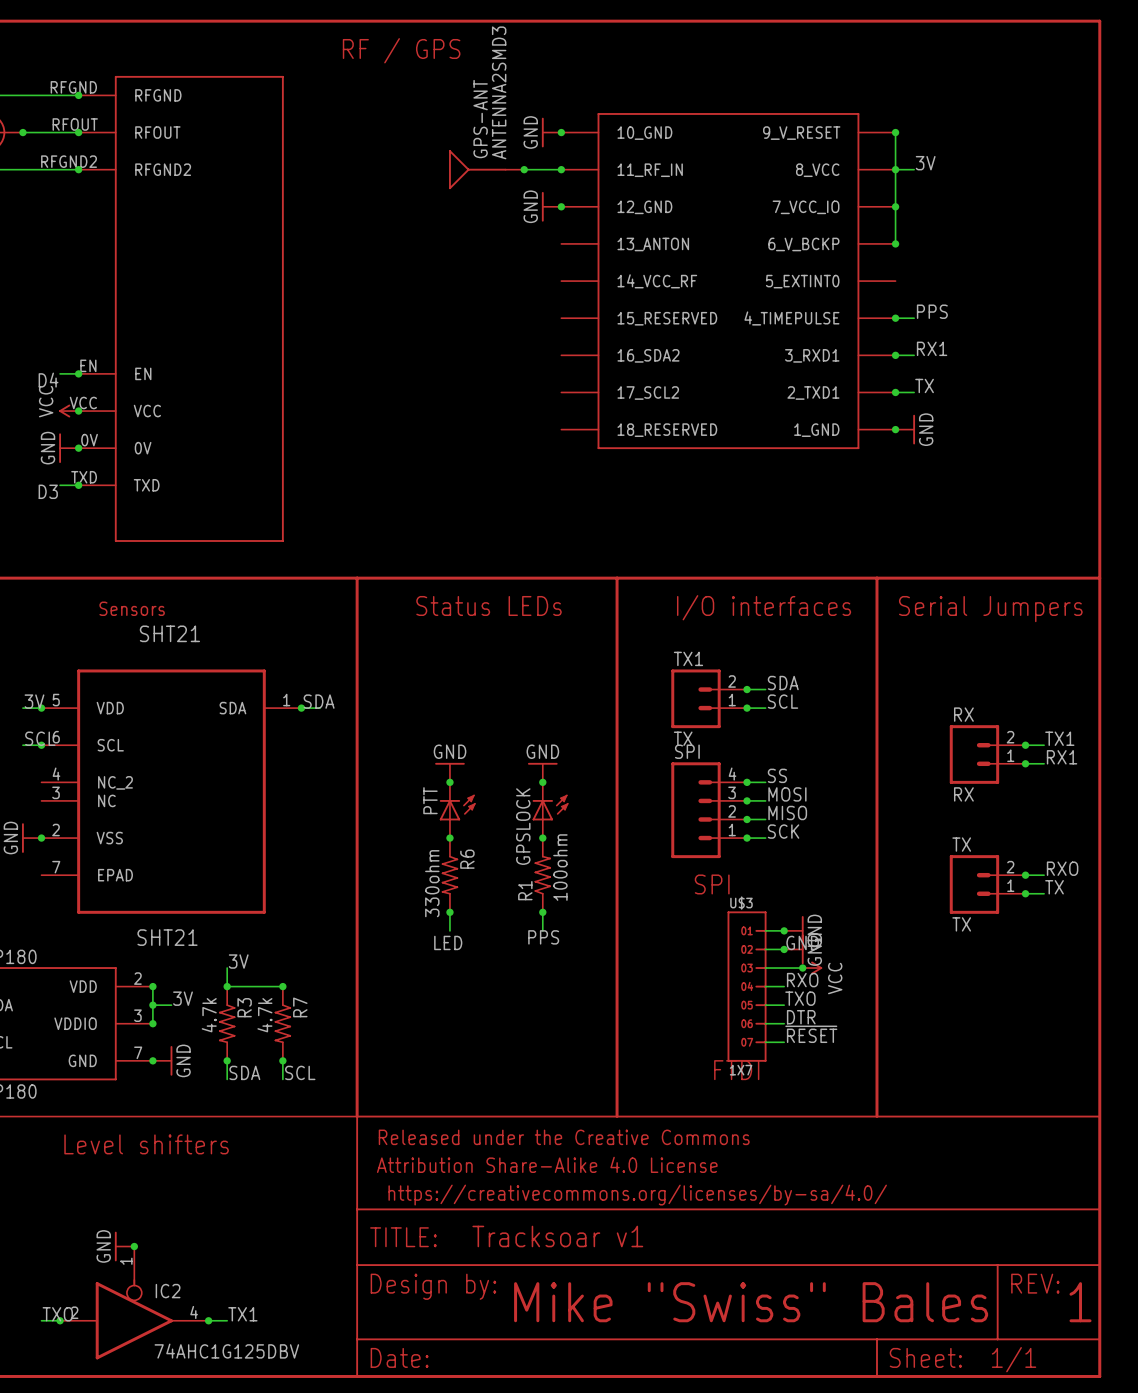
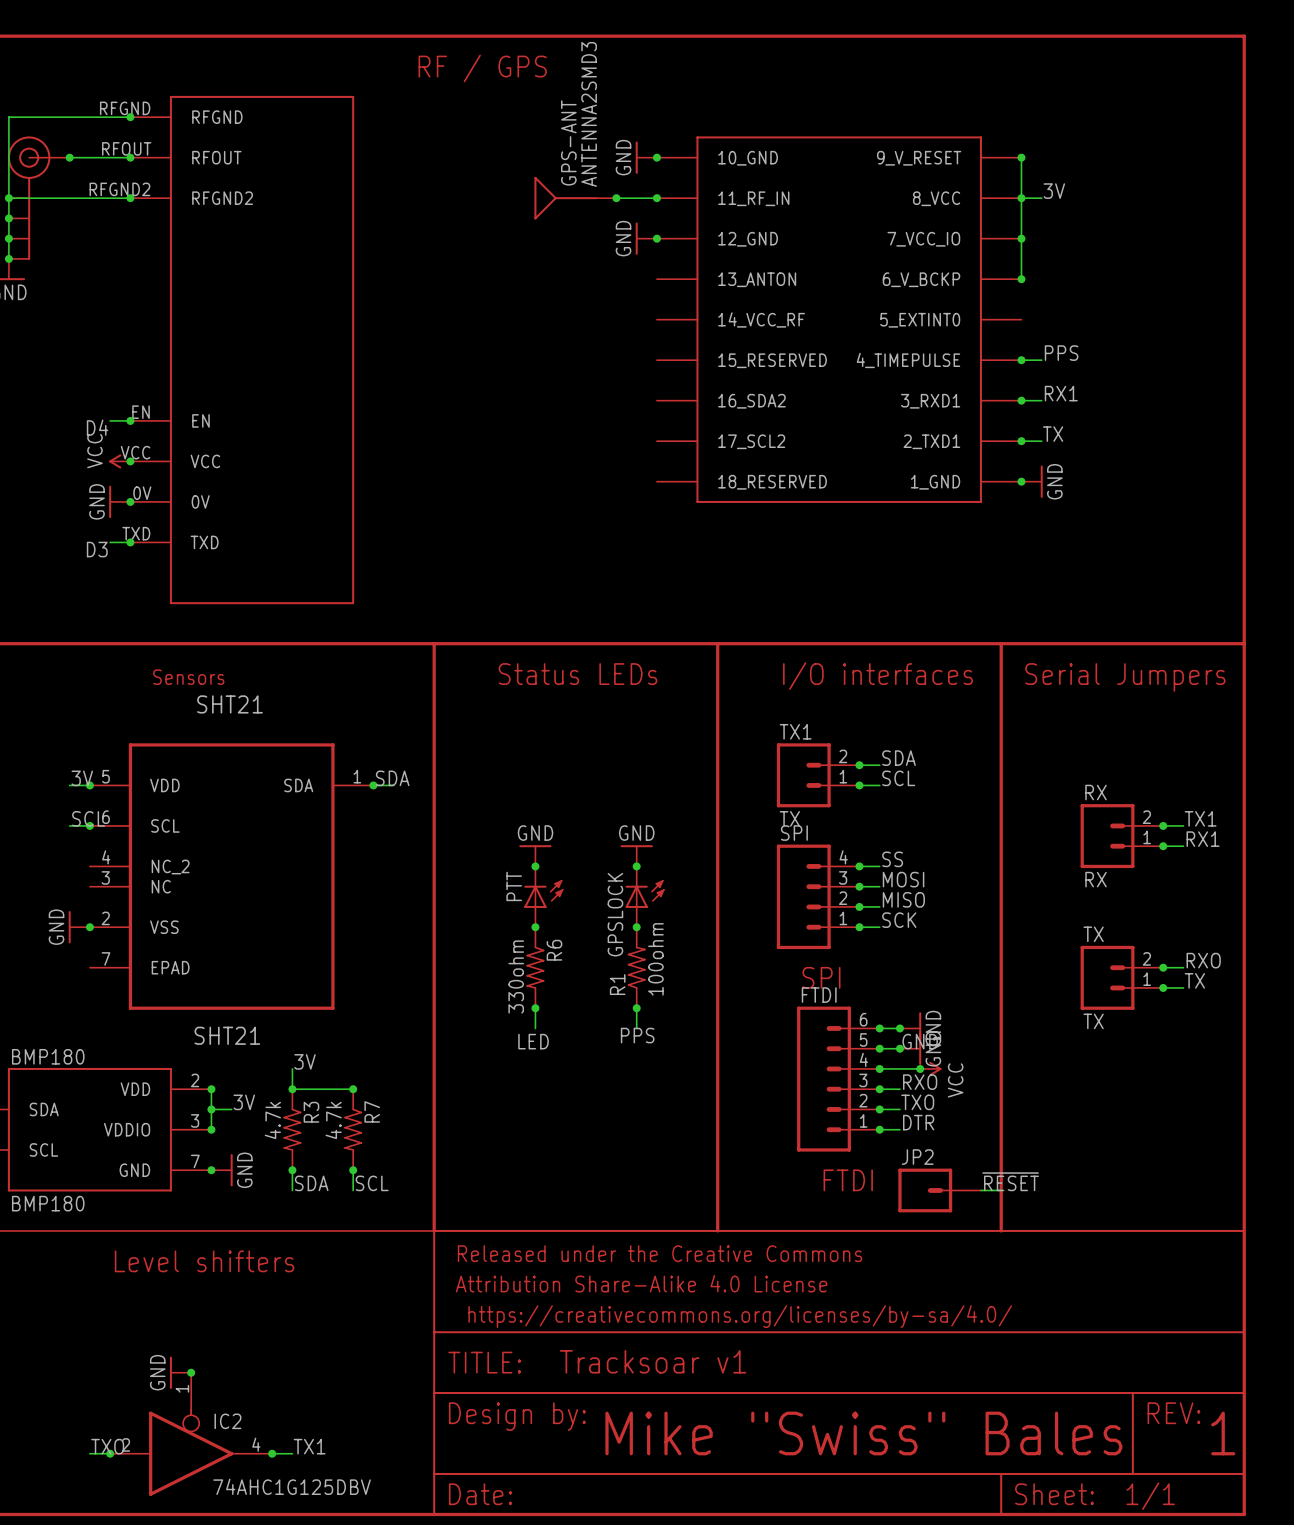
junction: none -> (879, 1028)
junction: none -> (879, 1048)
junction: none -> (879, 1068)
FTDI: none -> (838, 1079)
U$3: 1X7 (747, 986) -> none
junction: none -> (879, 1089)
junction: none -> (879, 1109)
junction: none -> (879, 1129)
label position: ~{RESET} (811, 1034) -> ~{RESET} (1010, 1181)
wire: (765, 1042) (784, 1042) -> (980, 1190) (1001, 1190)
JP2: none -> (939, 1190)

